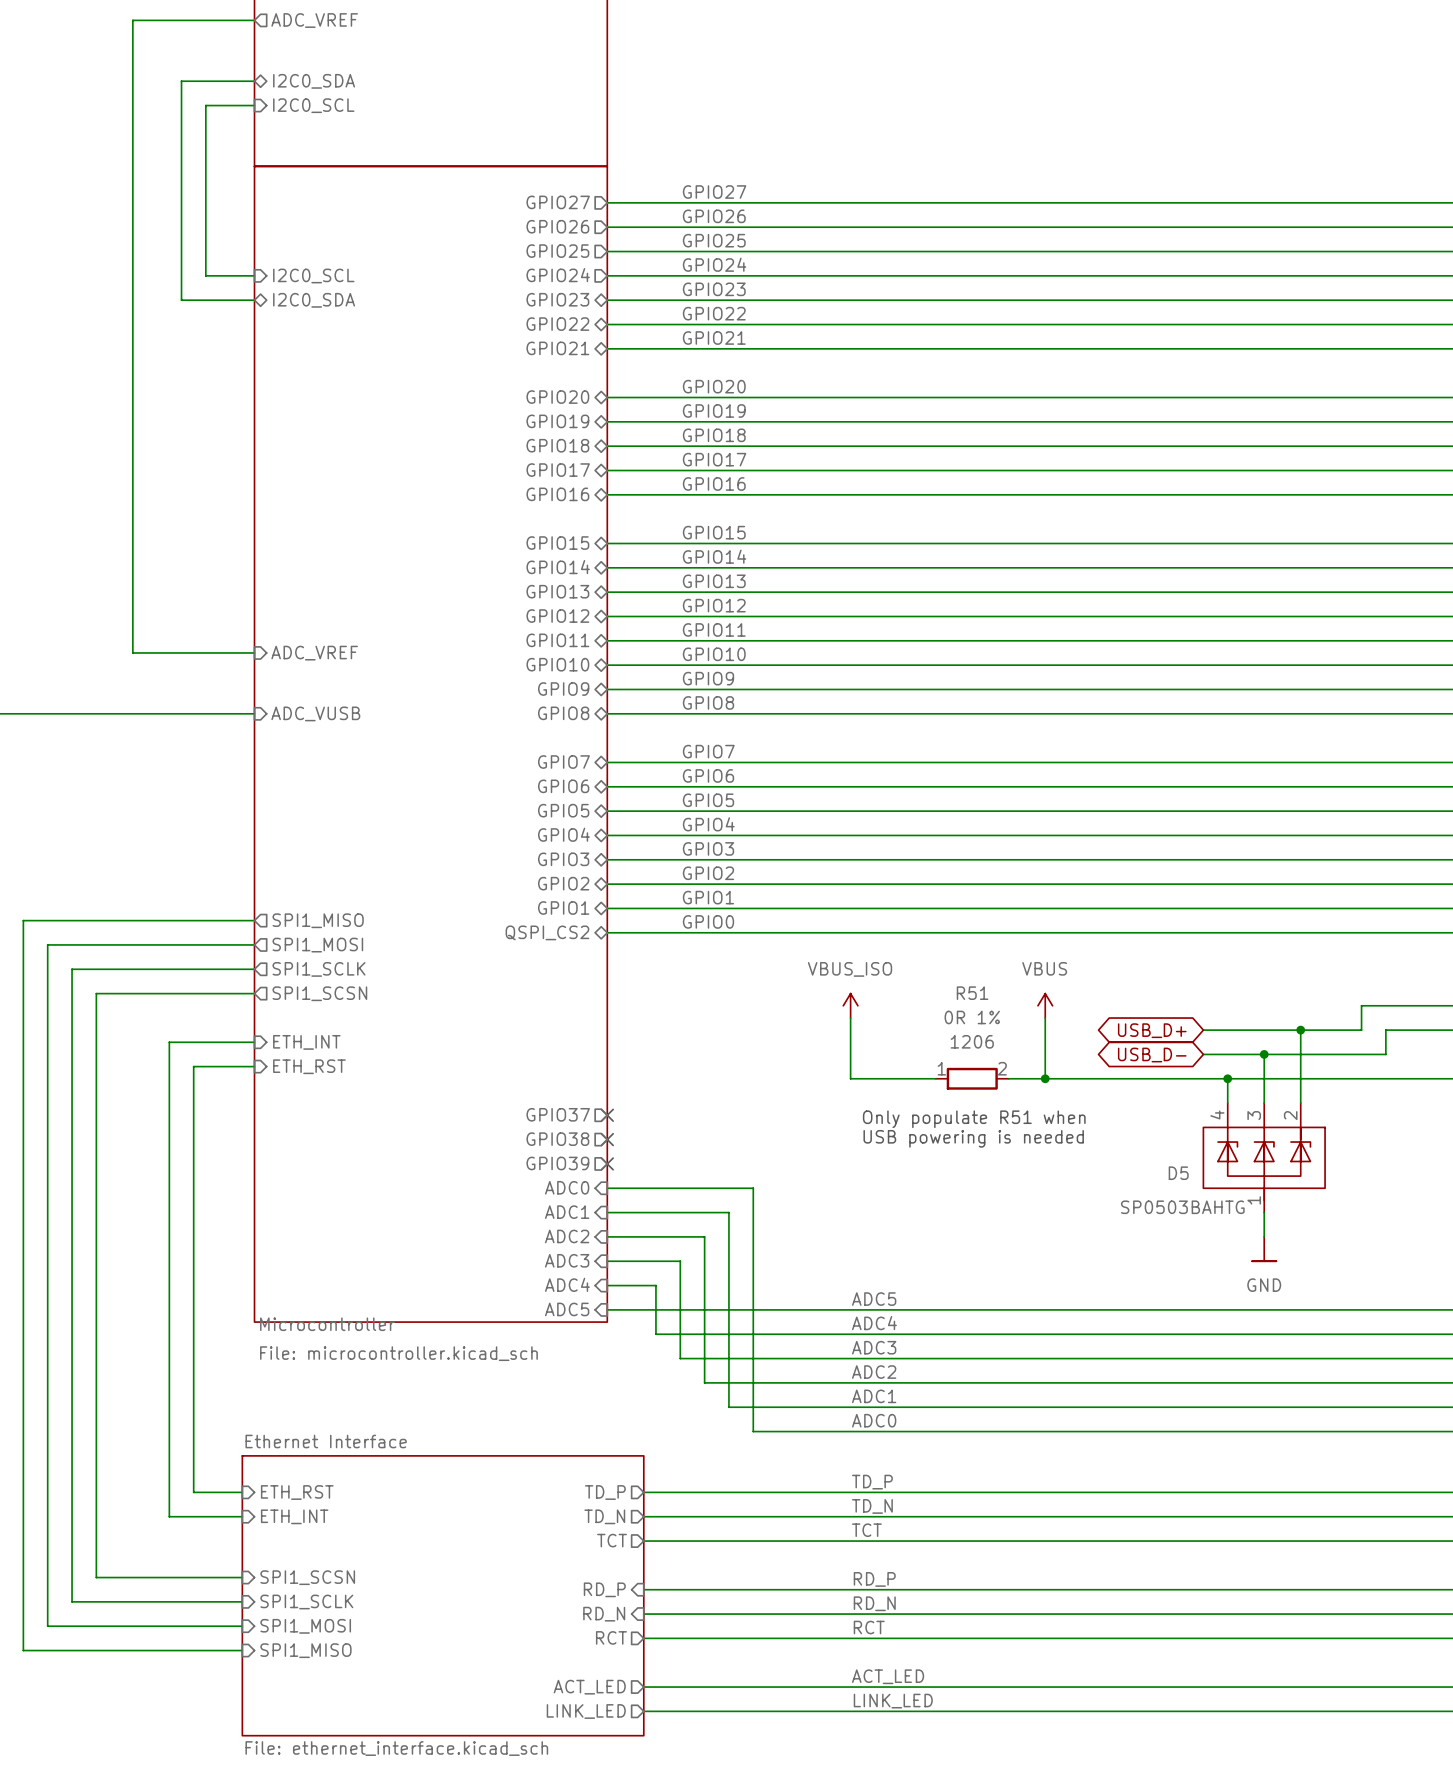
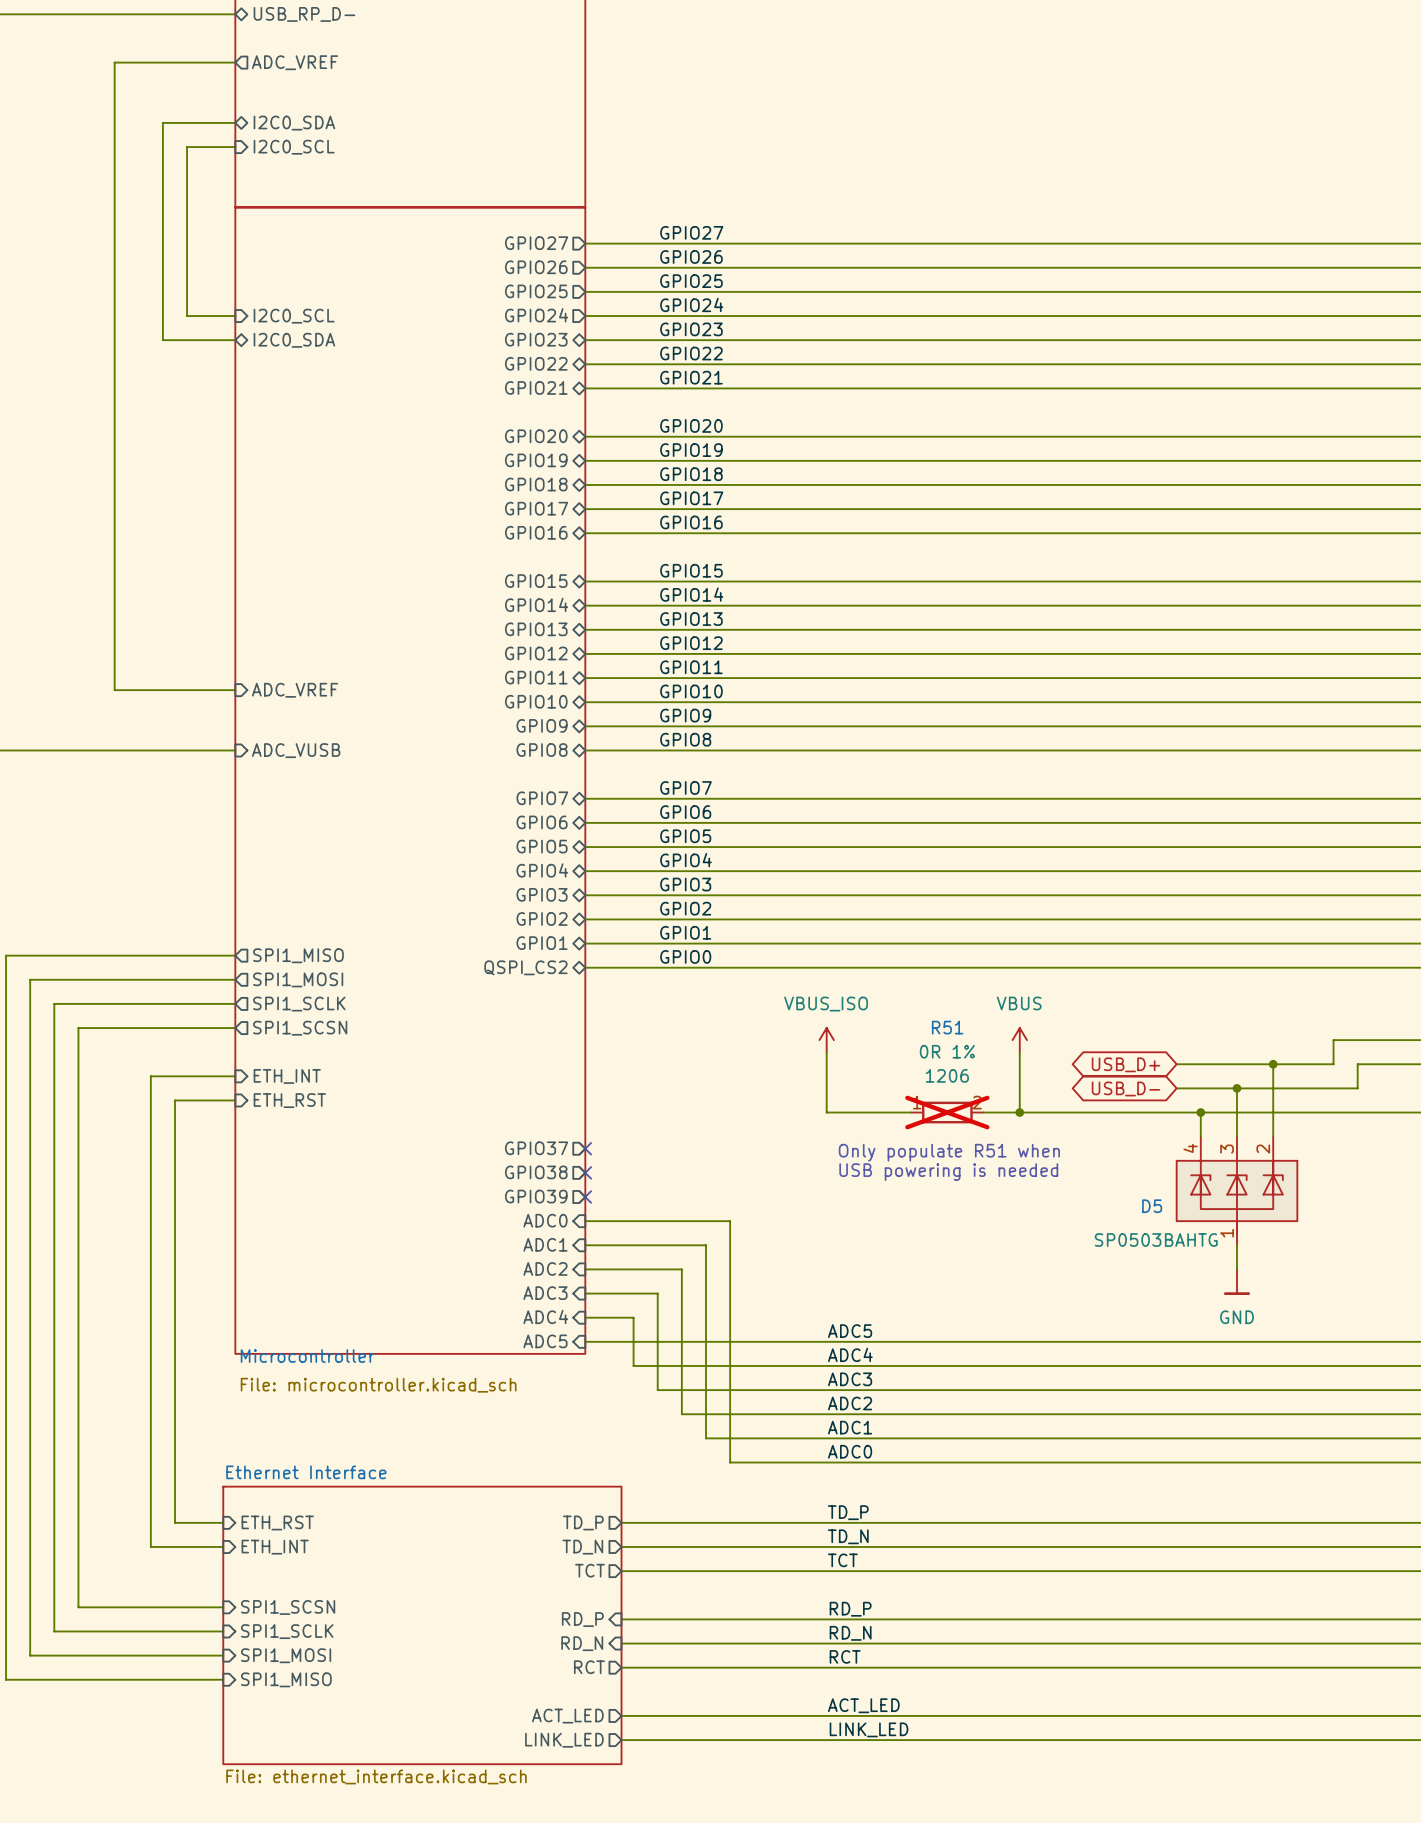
R51 do-not-place cross: none -> (947, 1112)

